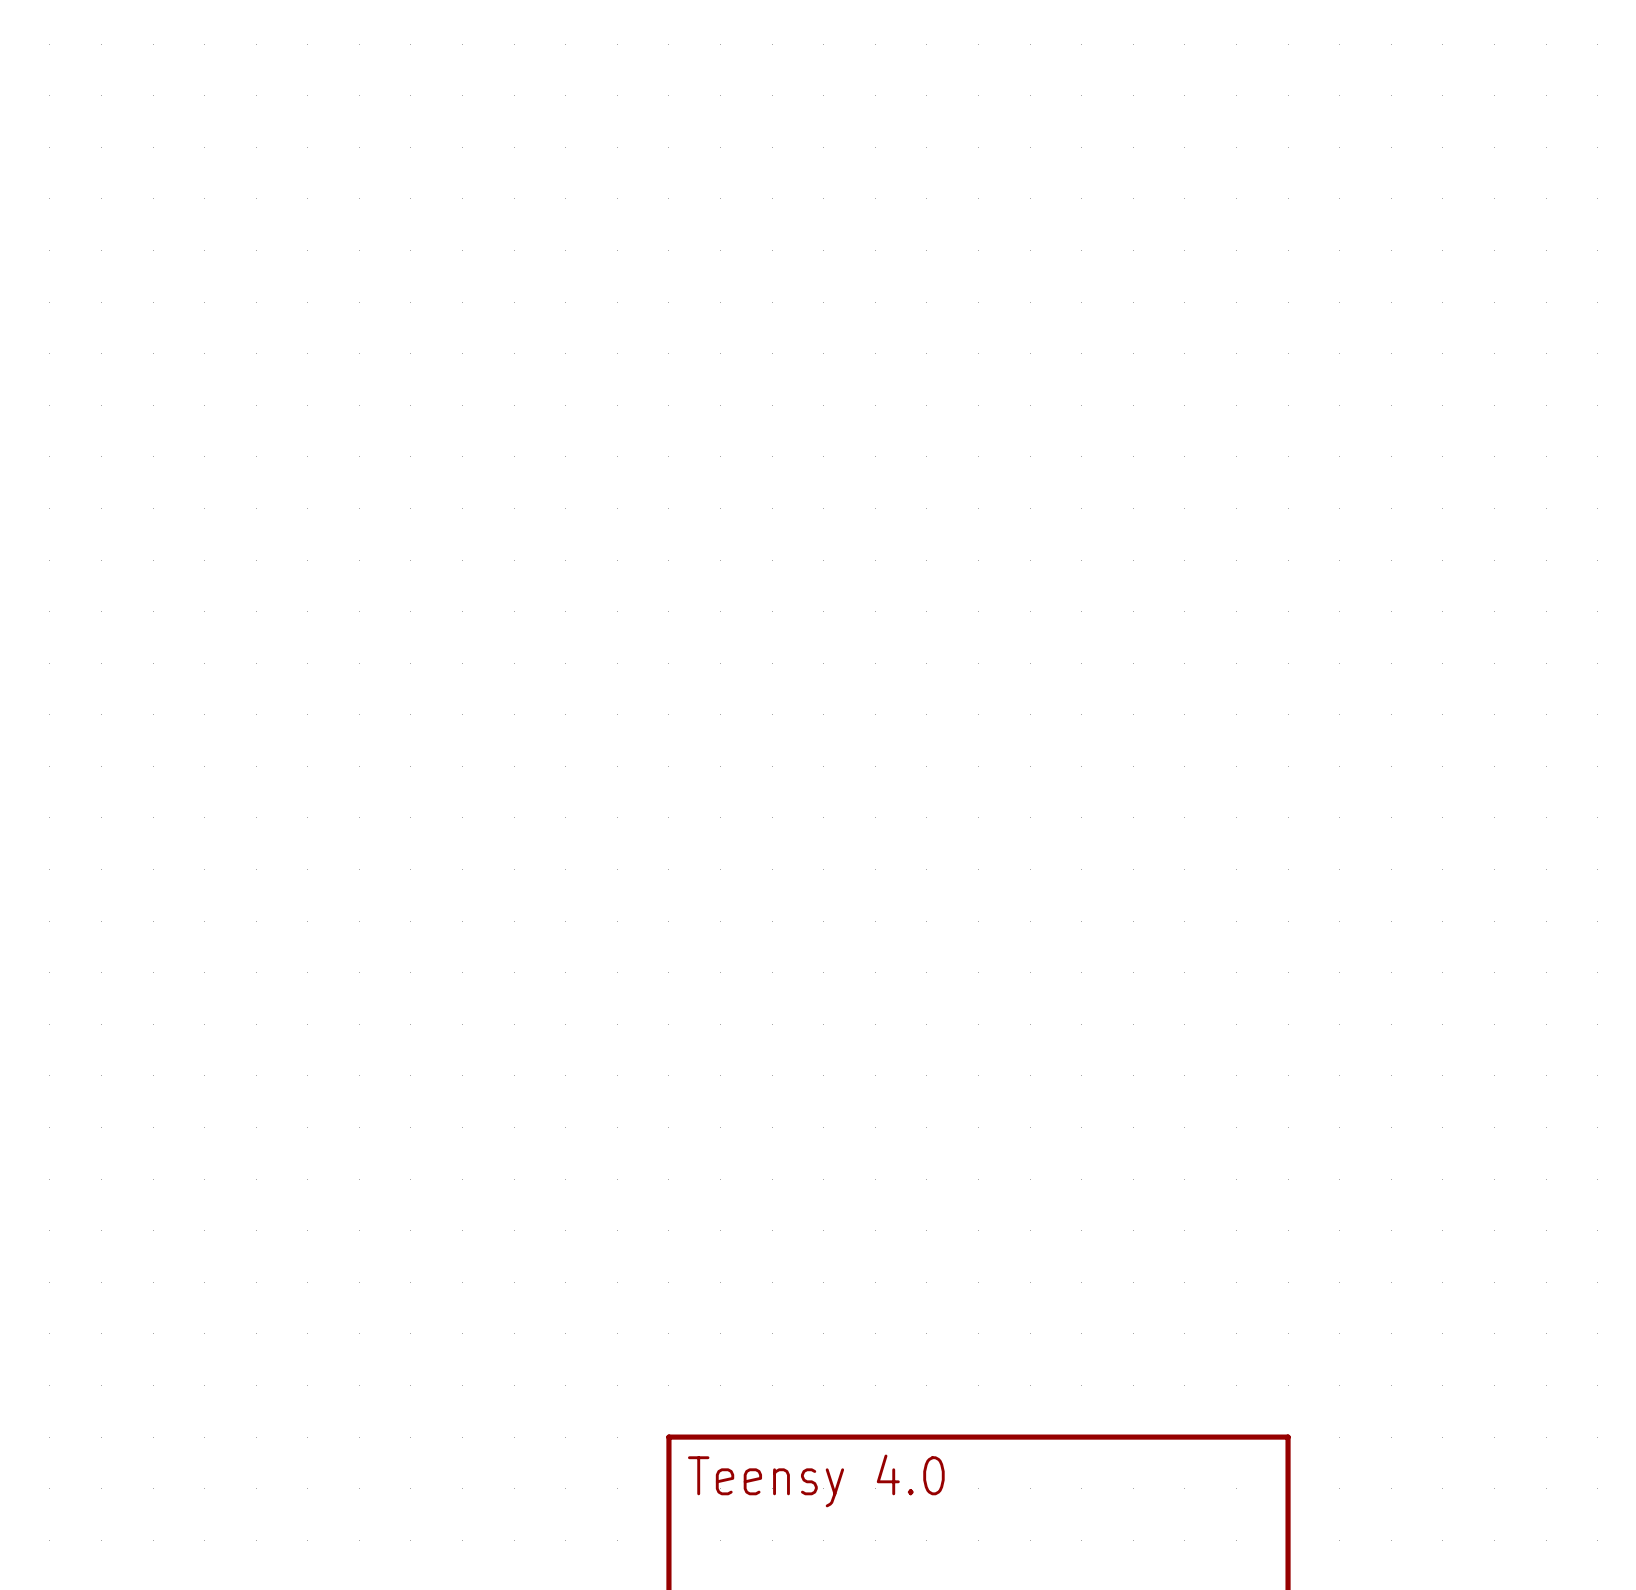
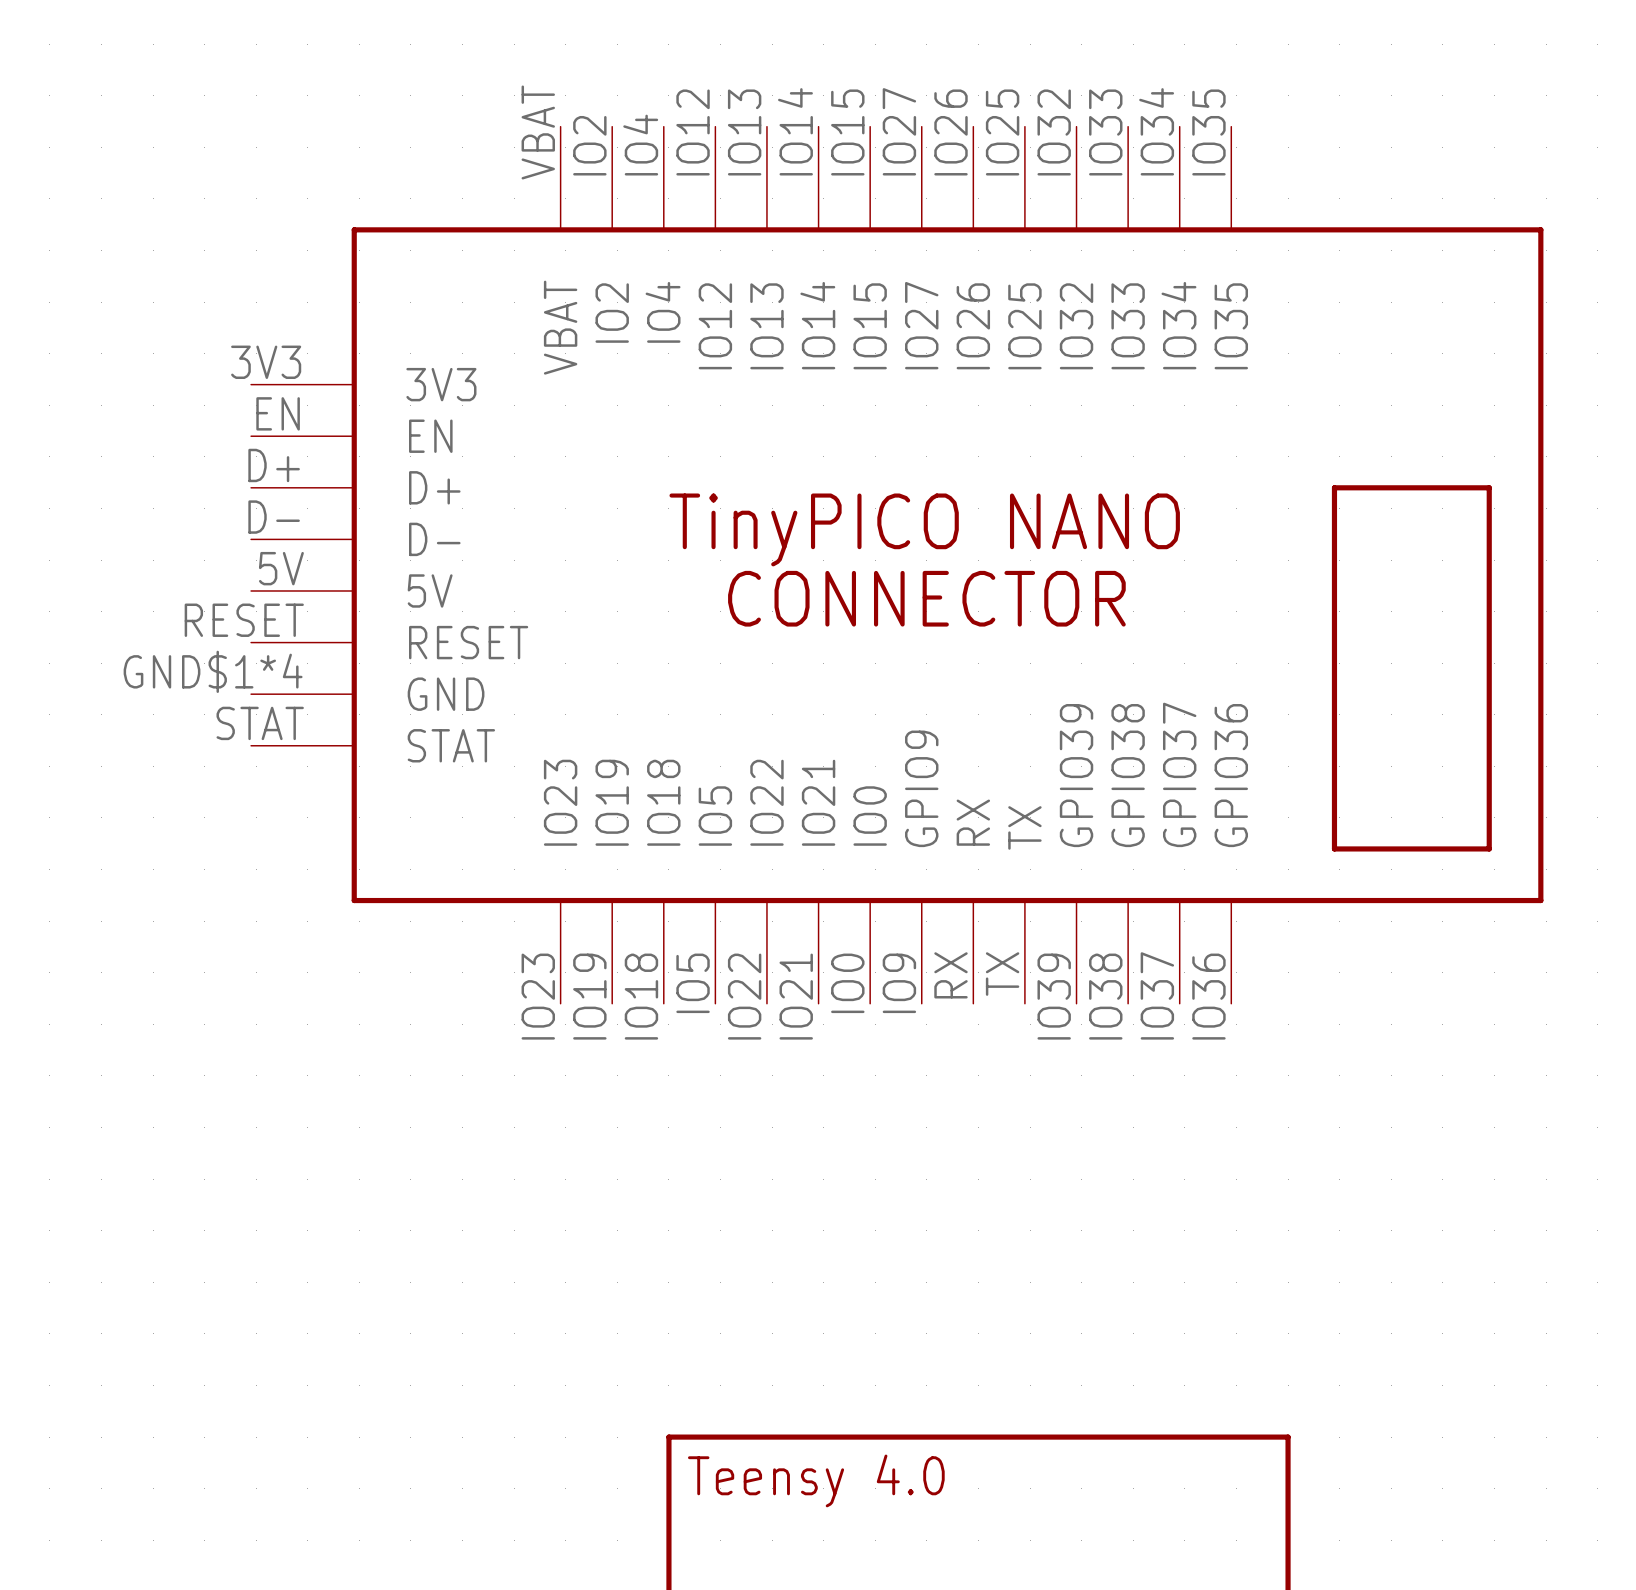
part: none -> (897, 565)

